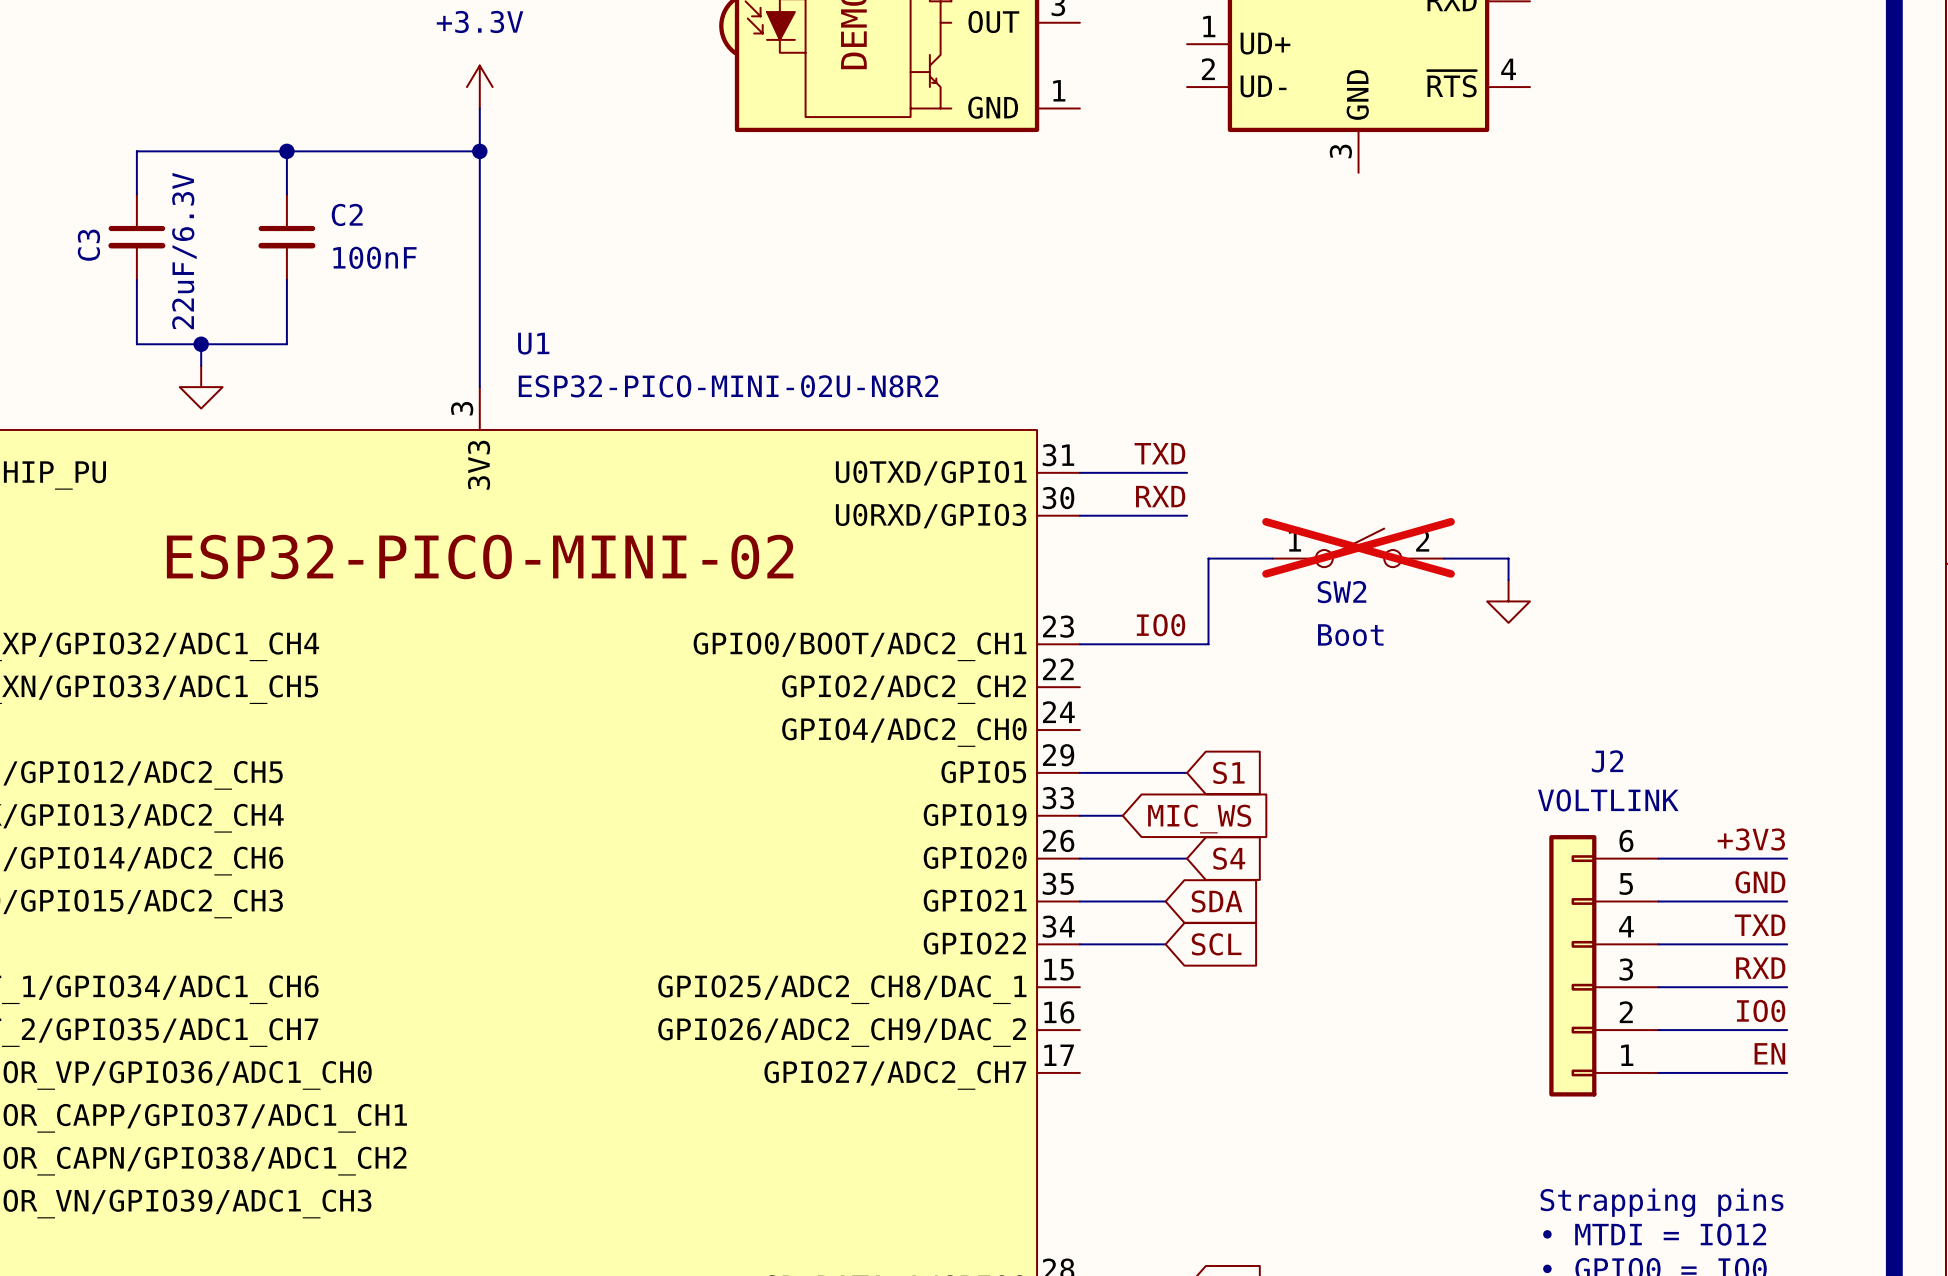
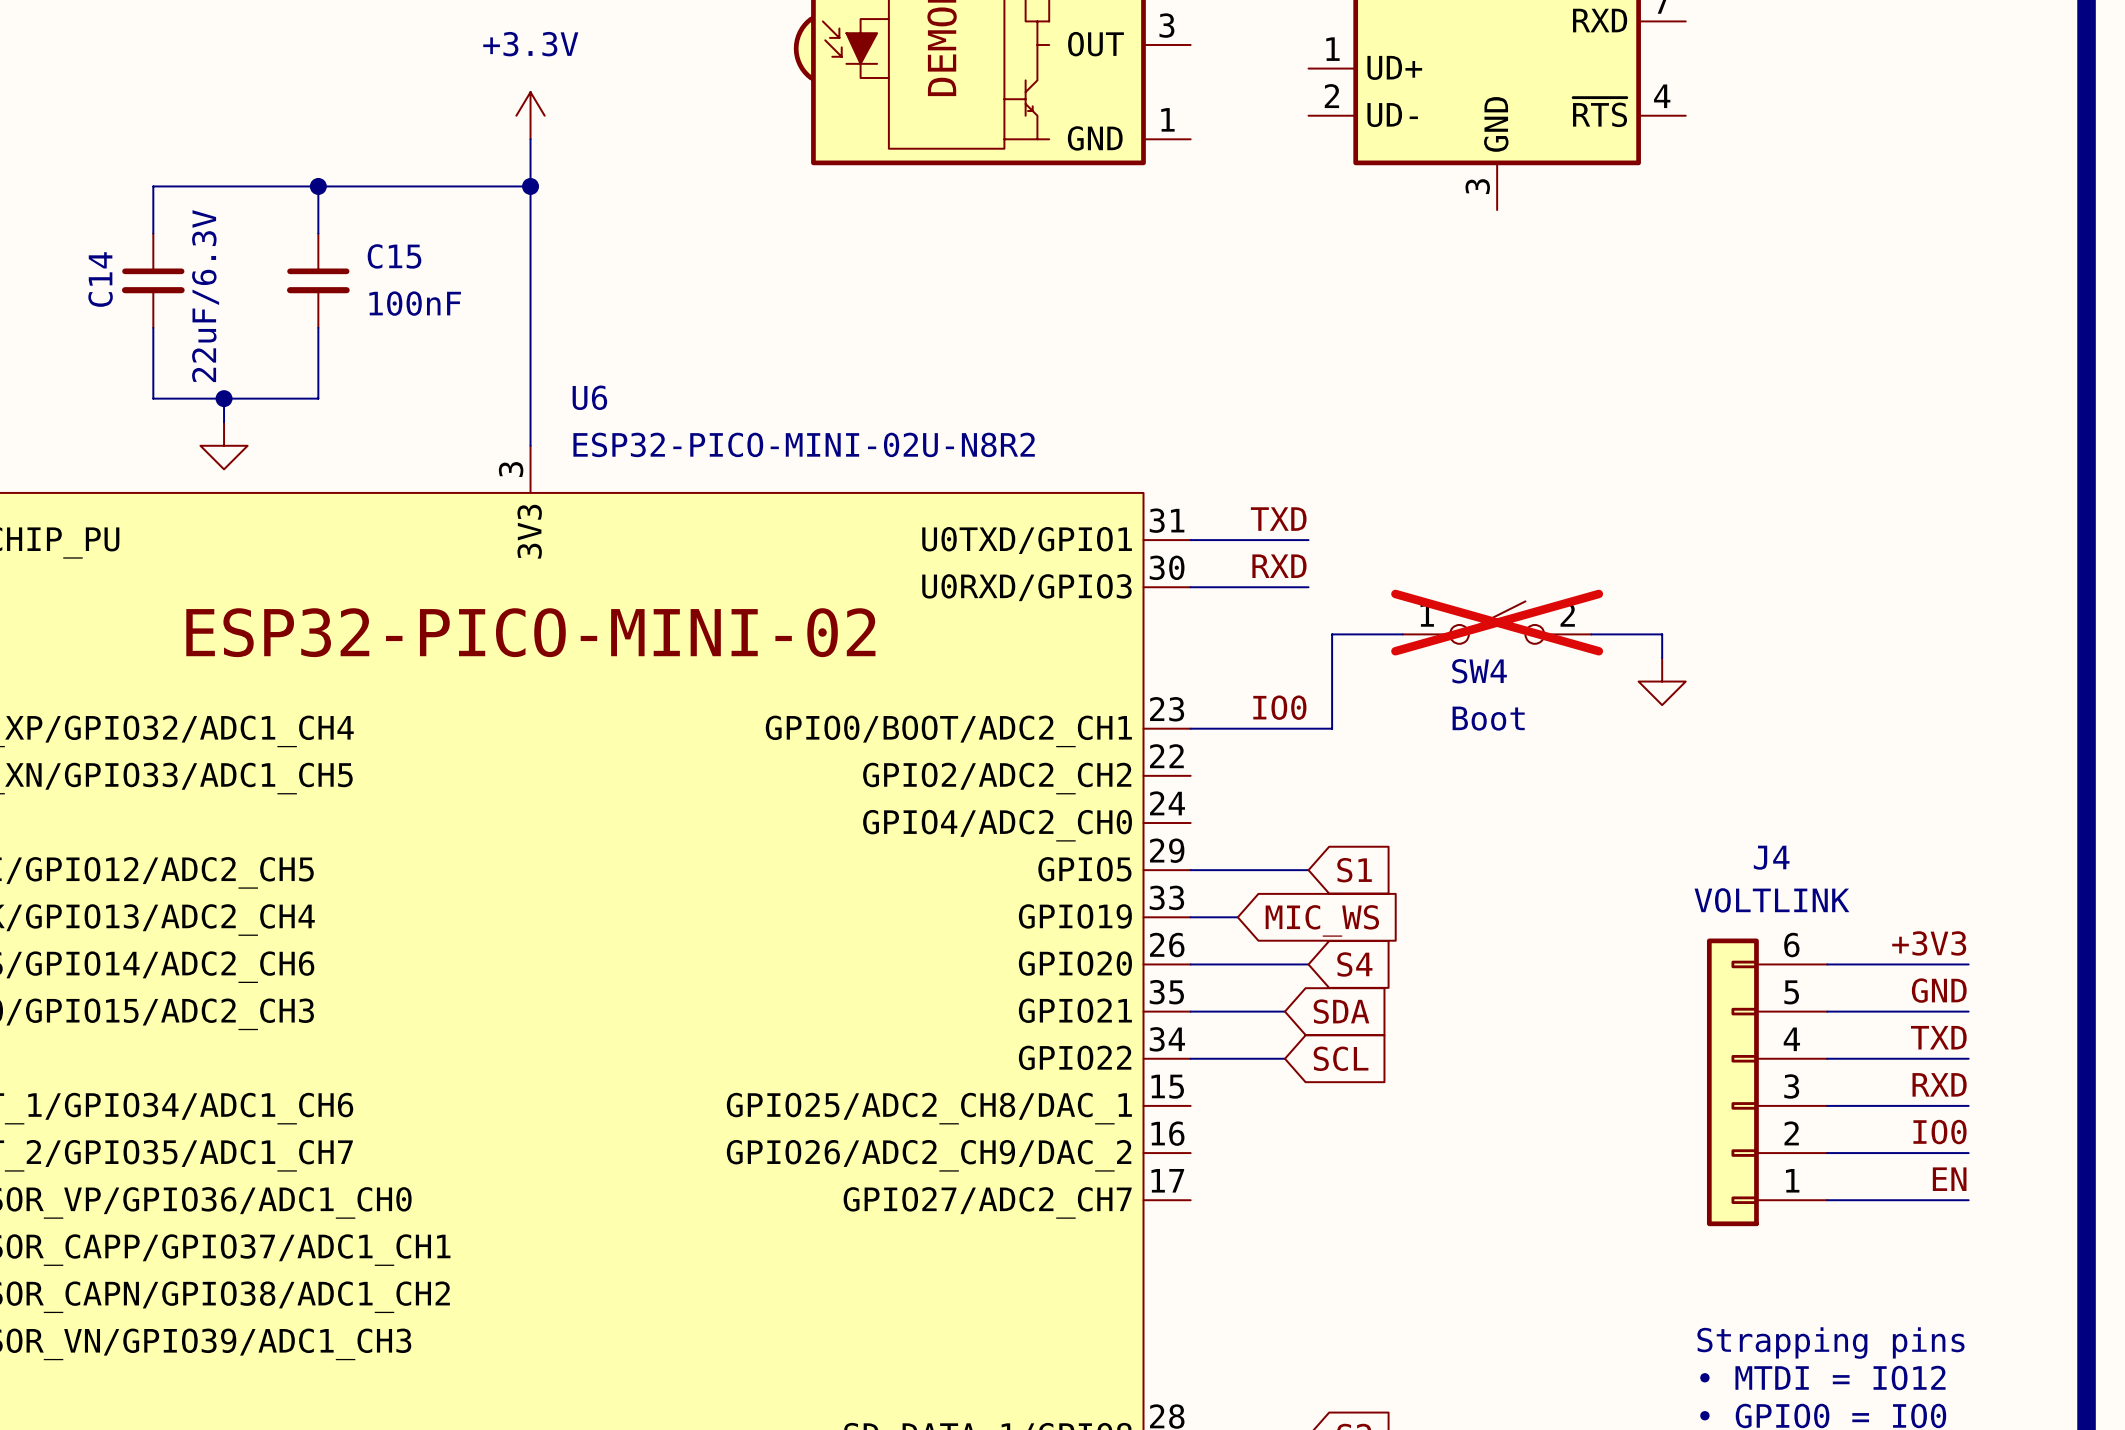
C2 name: C2 (347, 214) -> C15 (394, 256)
C3 name: C3 (88, 245) -> C14 (100, 279)
U1 name: U1 (533, 343) -> U6 (589, 397)
SW2 name: SW2 (1341, 592) -> SW4 (1479, 671)
J2 name: J2 (1607, 761) -> J4 (1771, 857)

